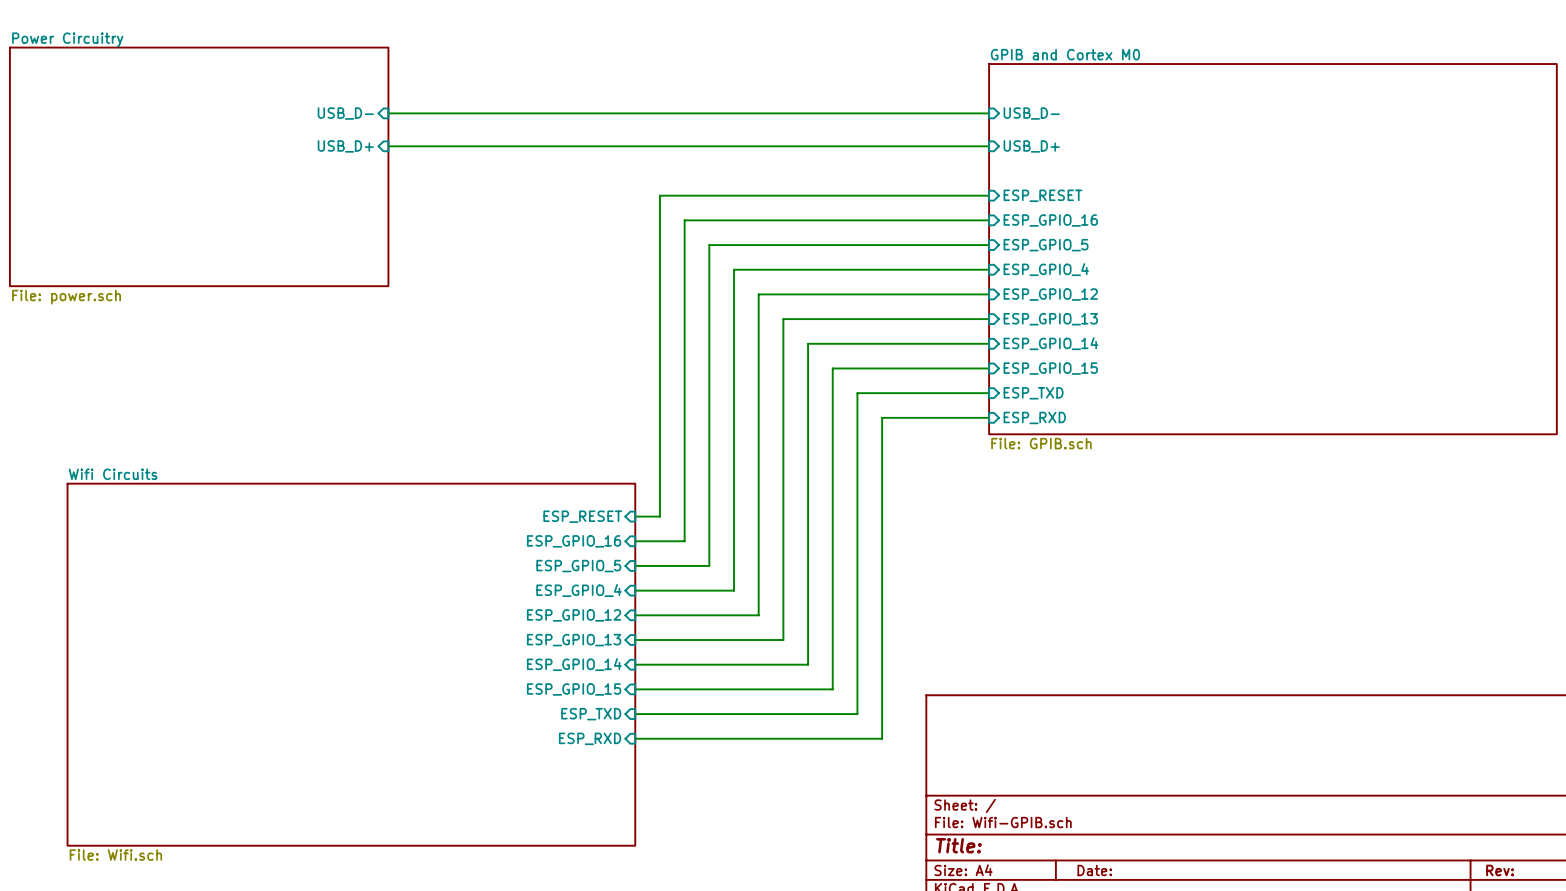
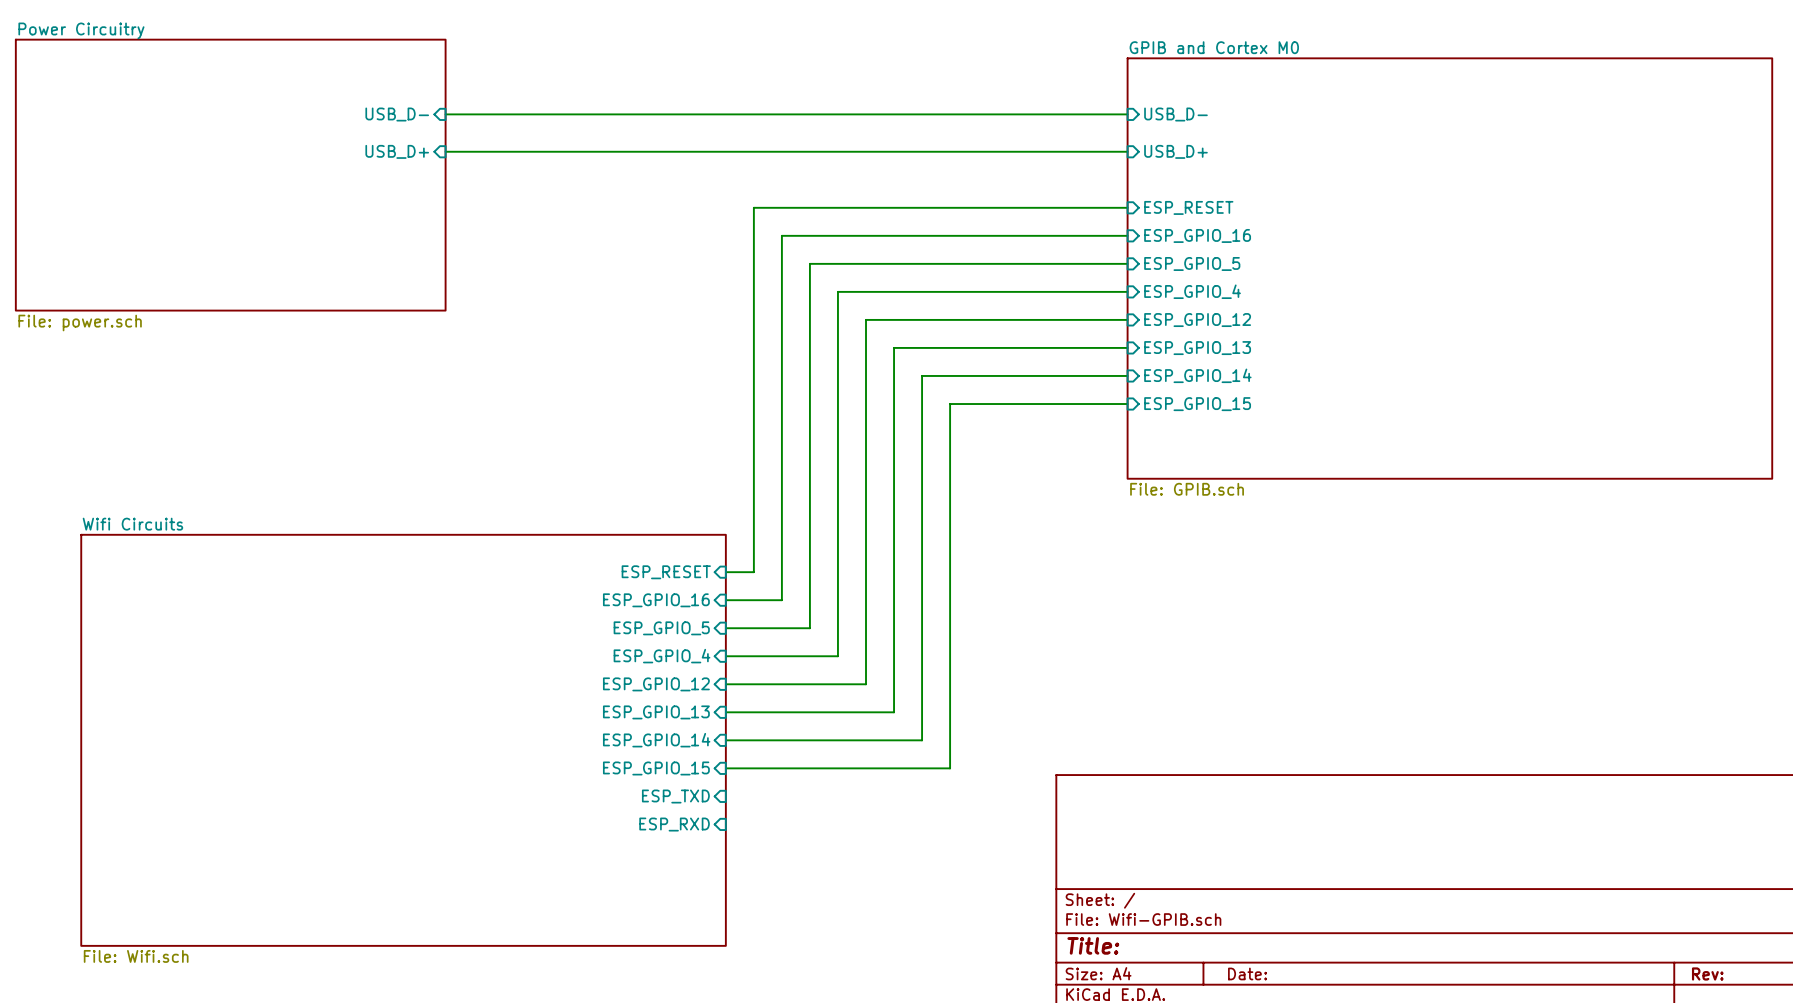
wire: (989, 393) (857, 393) (857, 714) (635, 714) -> none
sheet pin: ESP_TXD (1033, 393) -> none
wire: (989, 417) (882, 417) (882, 738) (635, 738) -> none
sheet pin: ESP_RXD (1034, 417) -> none

